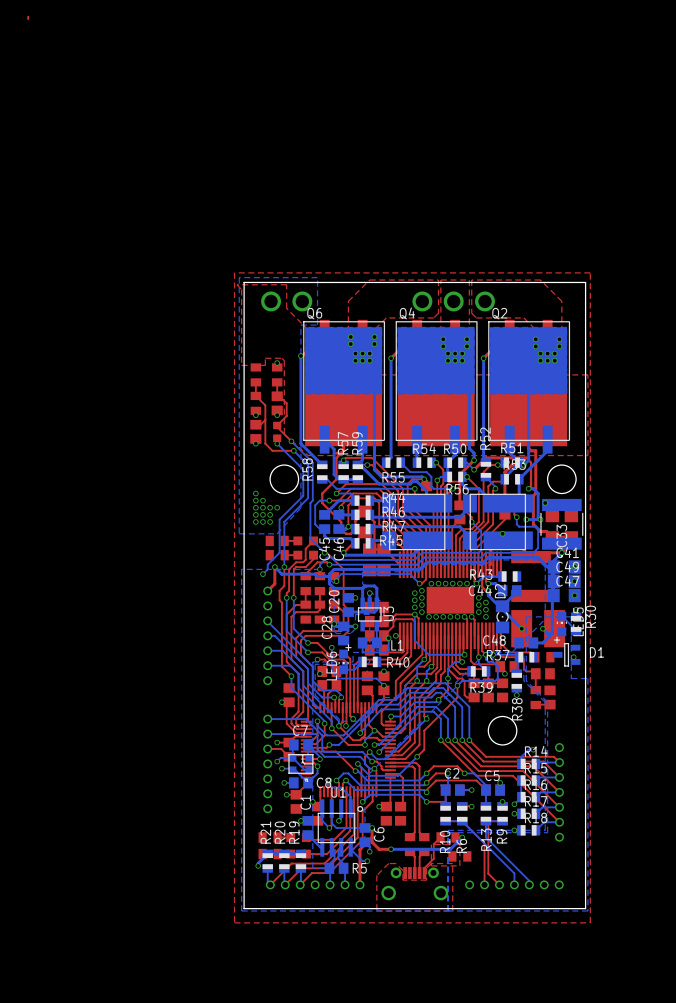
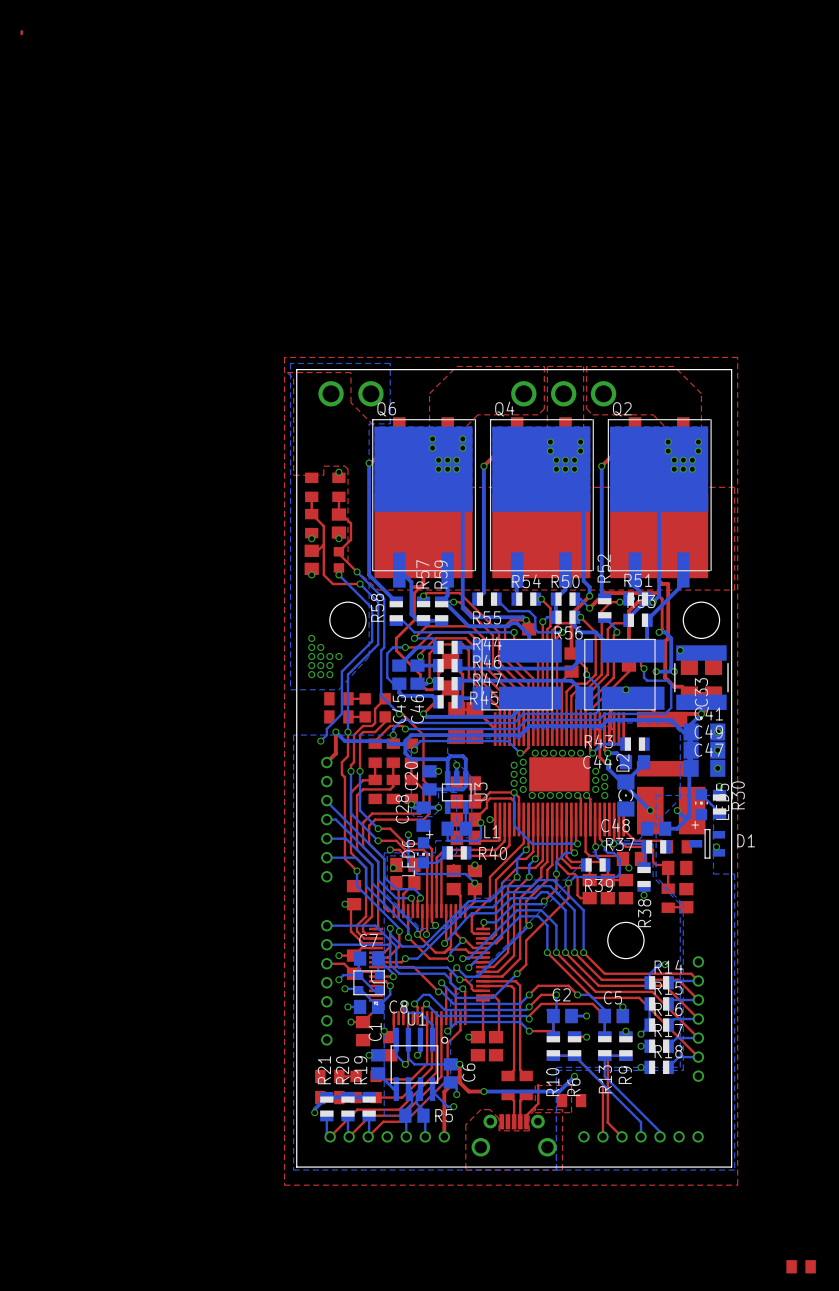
top track: (440, 837) (433, 844) -> none
part: (448, 837) -> none
part: none -> (801, 1266)

